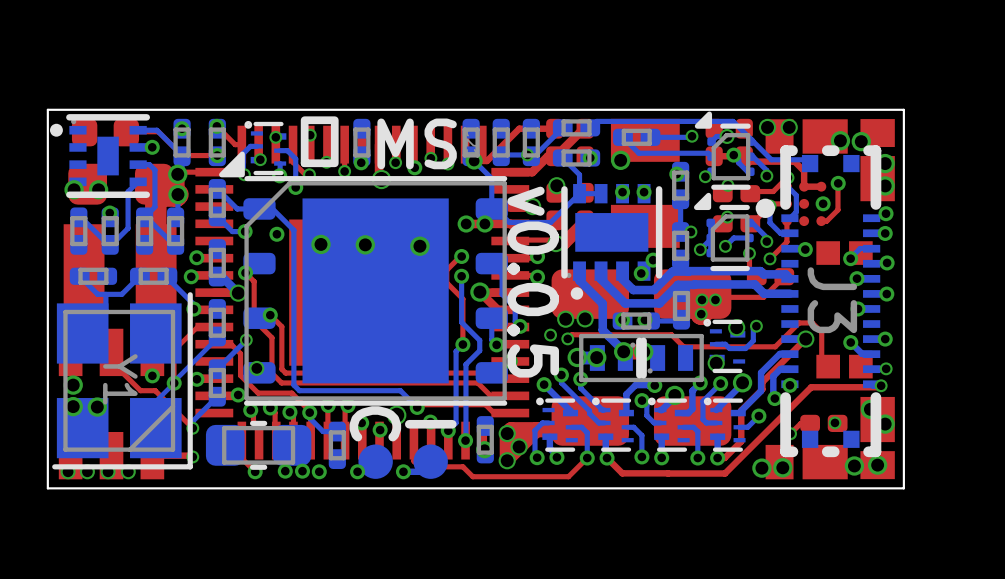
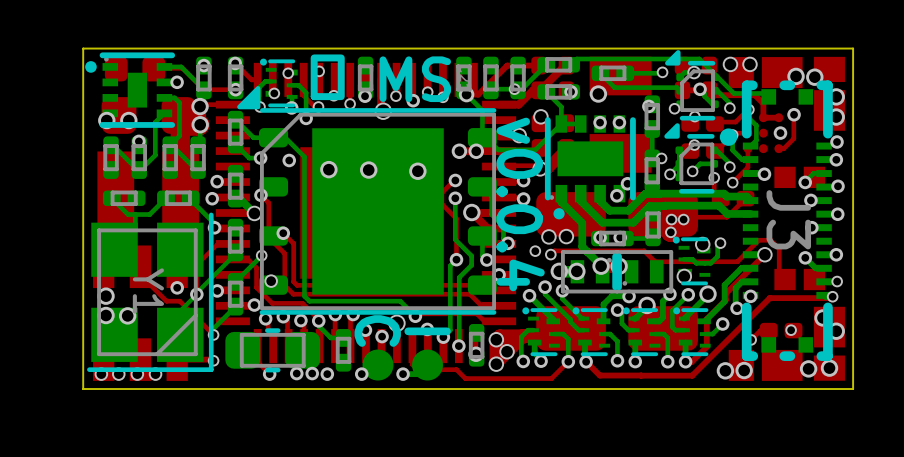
text: v0.0.5 (533, 282) -> v0.0.4 (520, 204)

